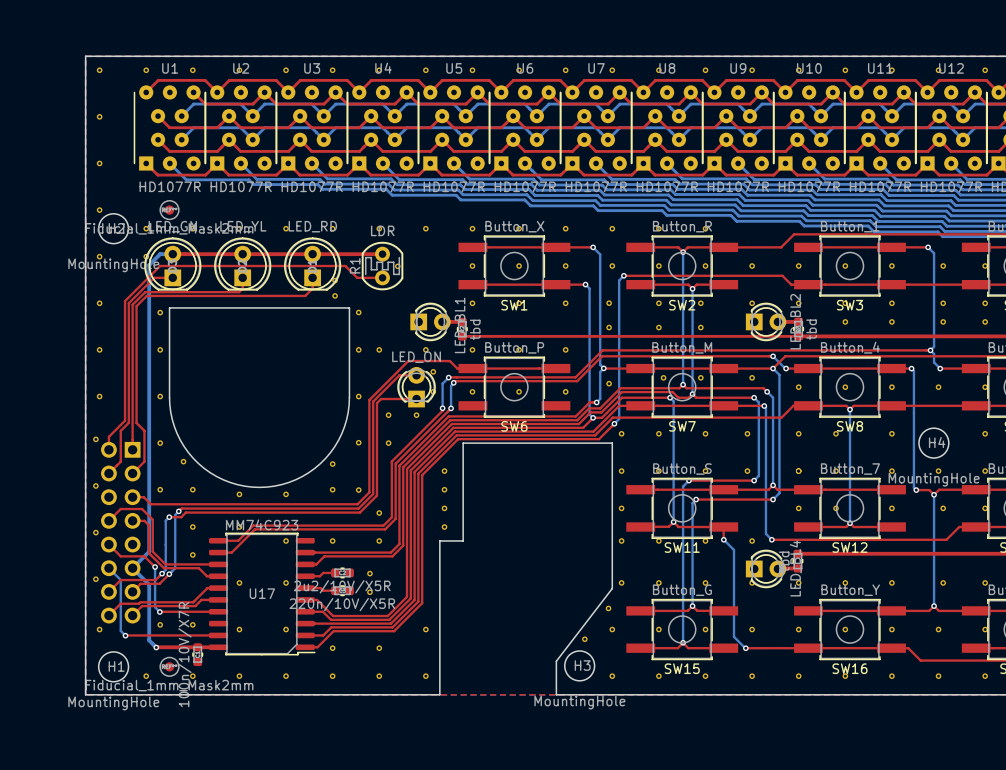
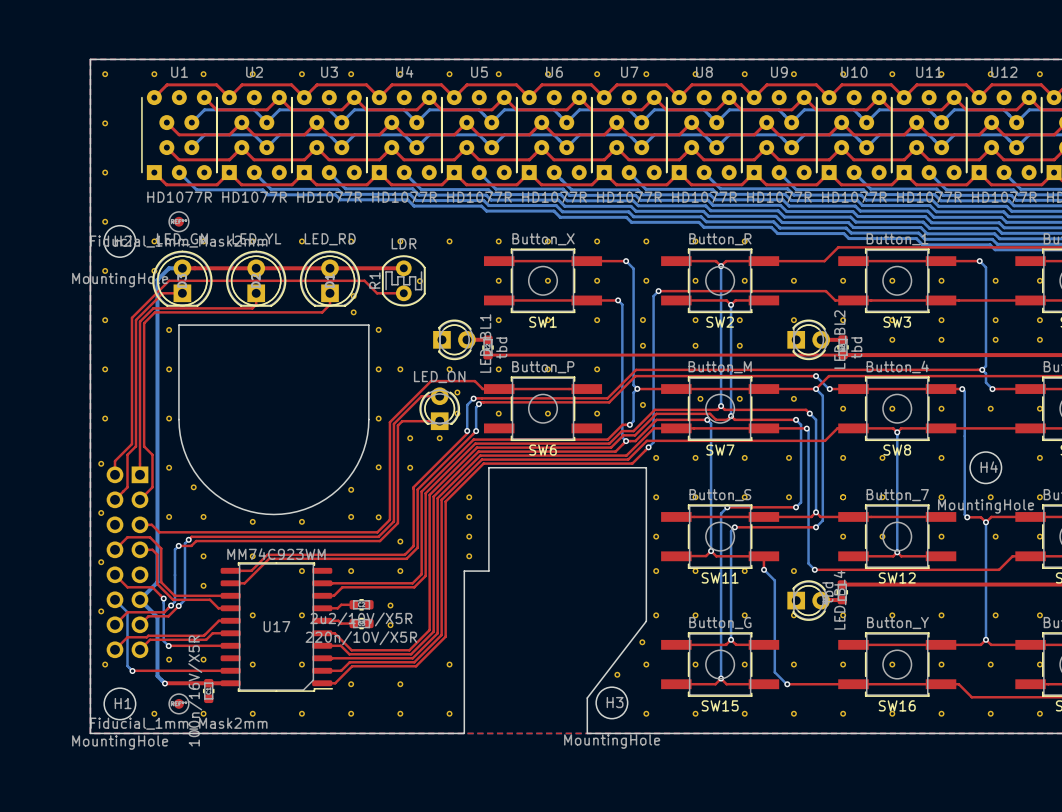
U17 value: MM74C923 (262, 524) -> MM74C923WM (276, 554)
part value: 100n/10V/X7R (184, 654) -> 100n/16V/X5R (195, 691)

